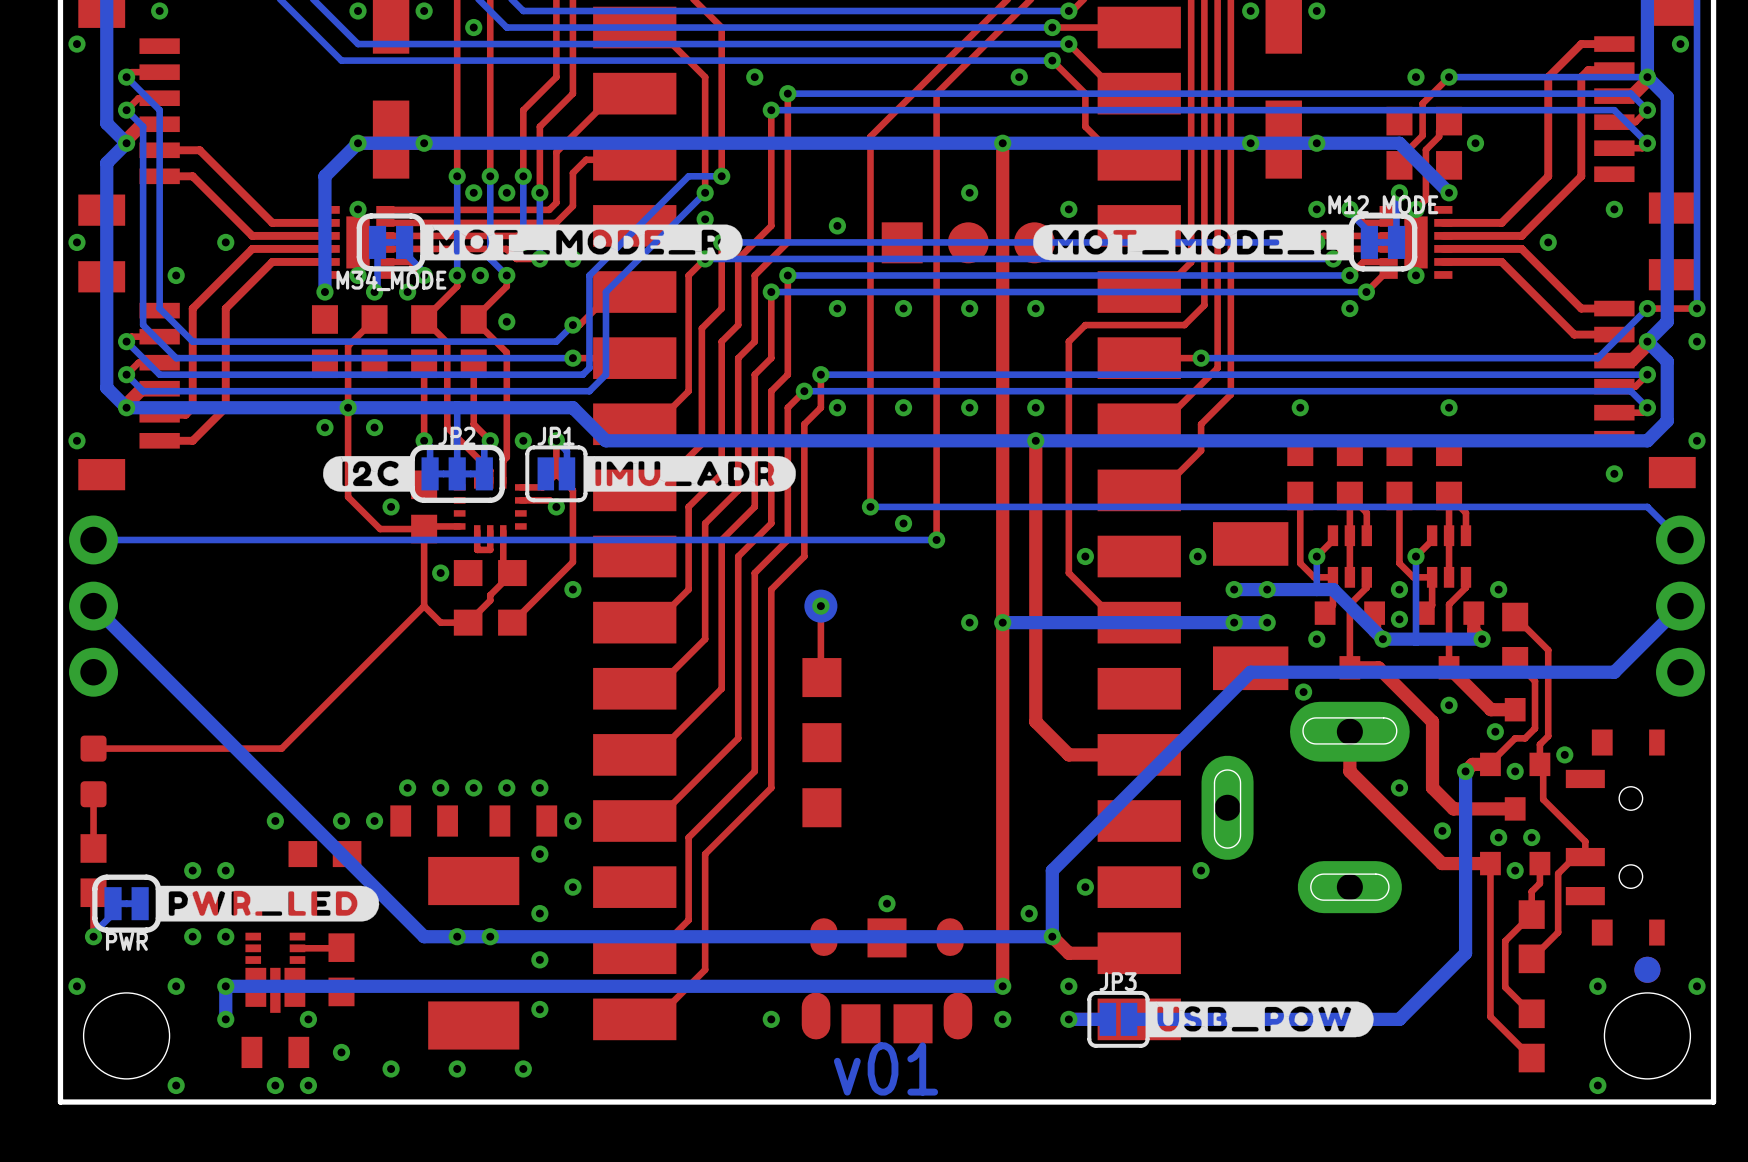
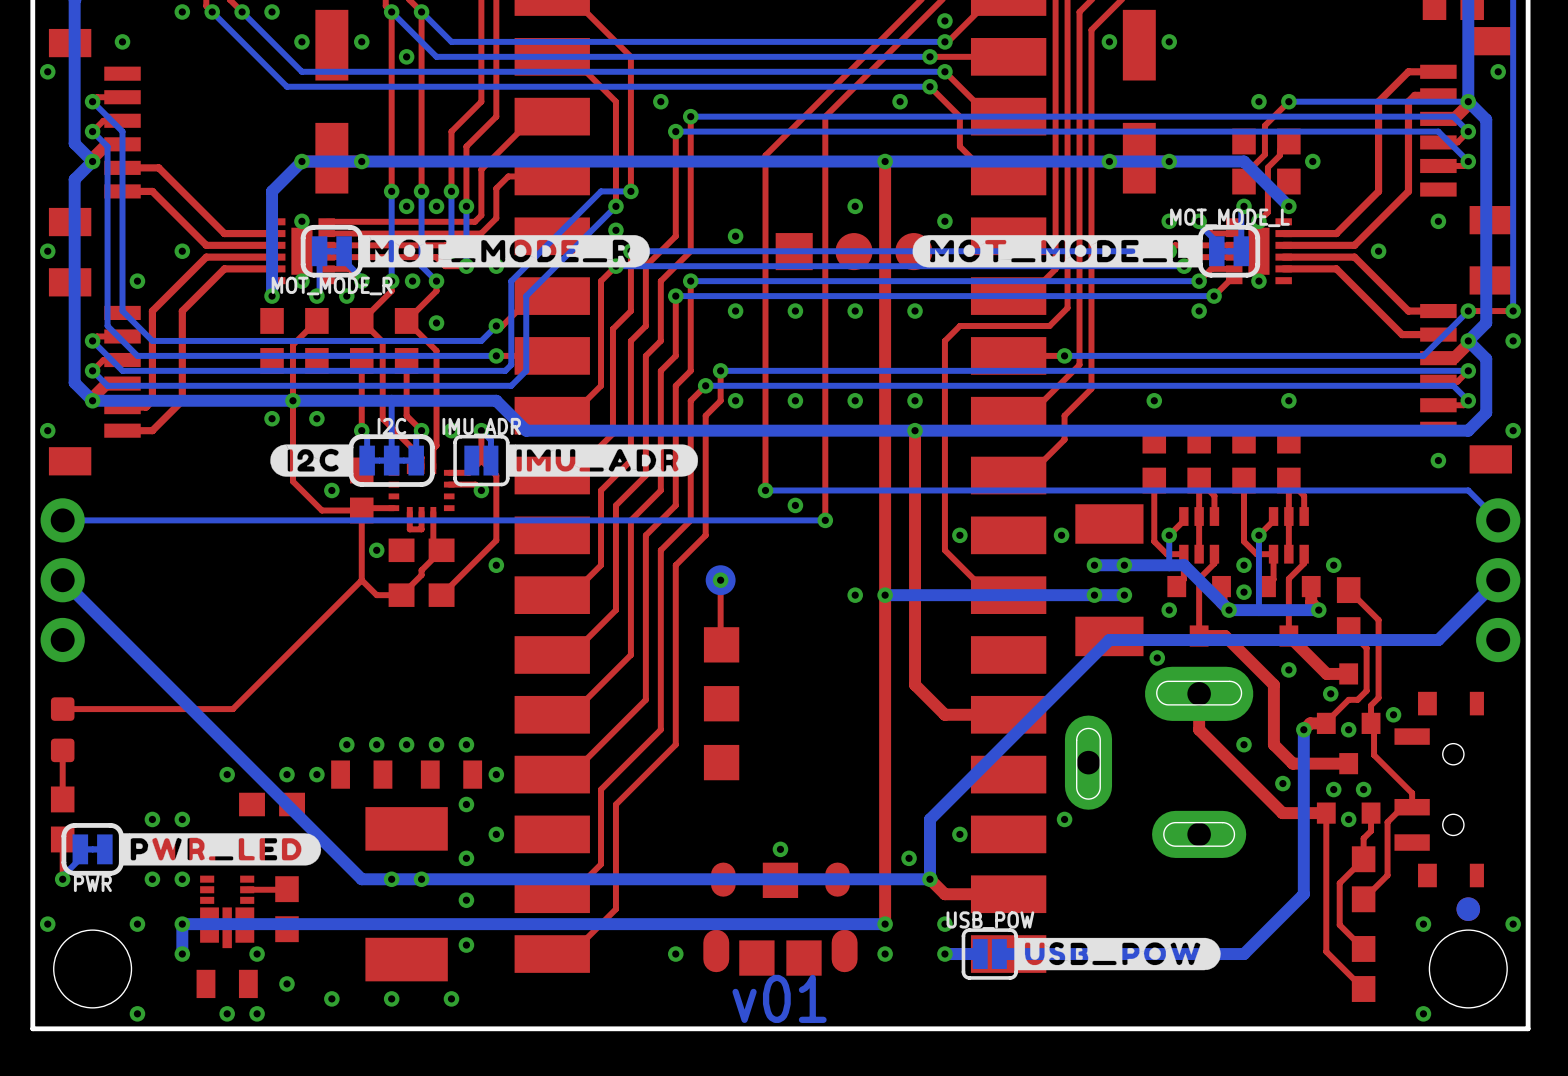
M12_MODE name: M12_MODE (1383, 205) -> MOT_MODE_L (1229, 217)
M34_MODE name: M34_MODE (391, 280) -> MOT_MODE_R (332, 286)
JP2 name: JP2 (456, 436) -> I2C (391, 426)
JP1 name: JP1 (556, 436) -> IMU_ADR (481, 427)
JP3 name: JP3 (1118, 981) -> USB_POW (990, 920)

